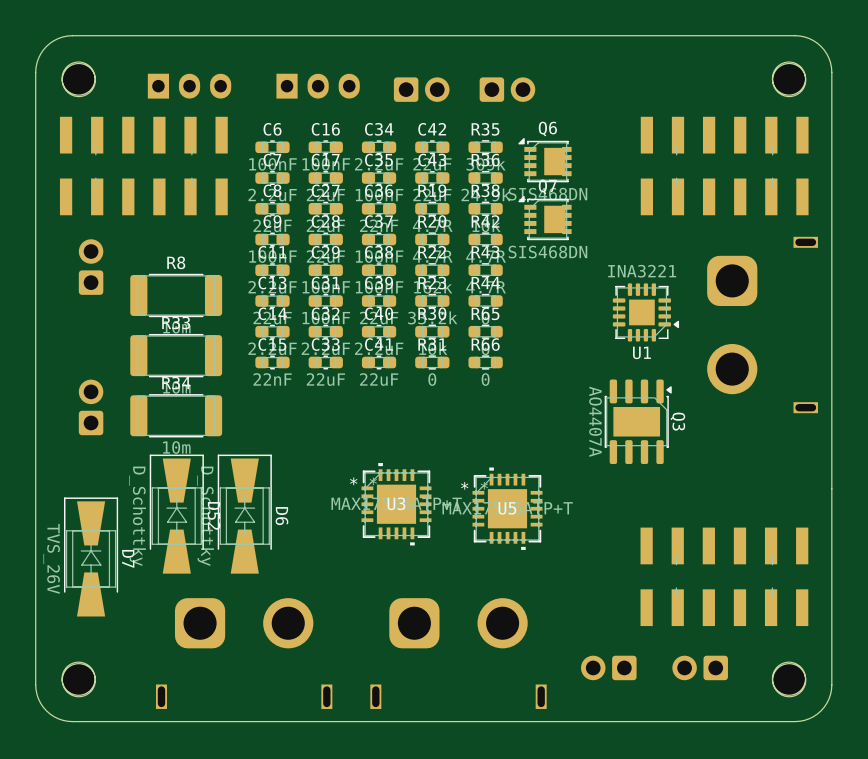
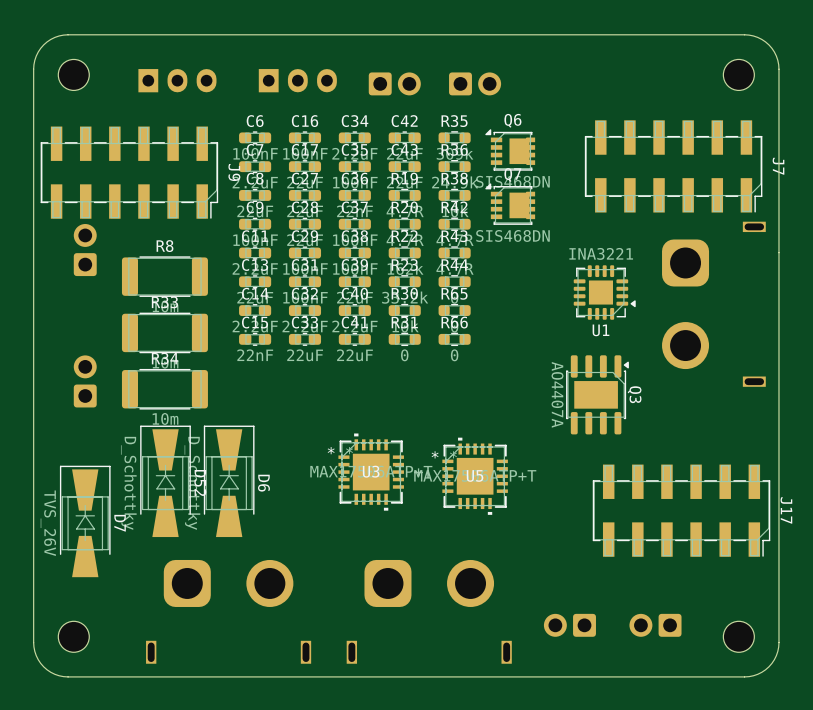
board edge: none -> (744, 34) (68, 34) (54, 37) (43, 44) (36, 56) (33, 69) (33, 642) (36, 655) (43, 666) (54, 674) (68, 676) (744, 676) (757, 674) (768, 666) (776, 655) (778, 642) (778, 69) (776, 56) (768, 44) (757, 37) (744, 34)
J7: none -> (673, 166)
J9: none -> (129, 172)
part: (433, 378) -> none
J17: none -> (681, 510)

